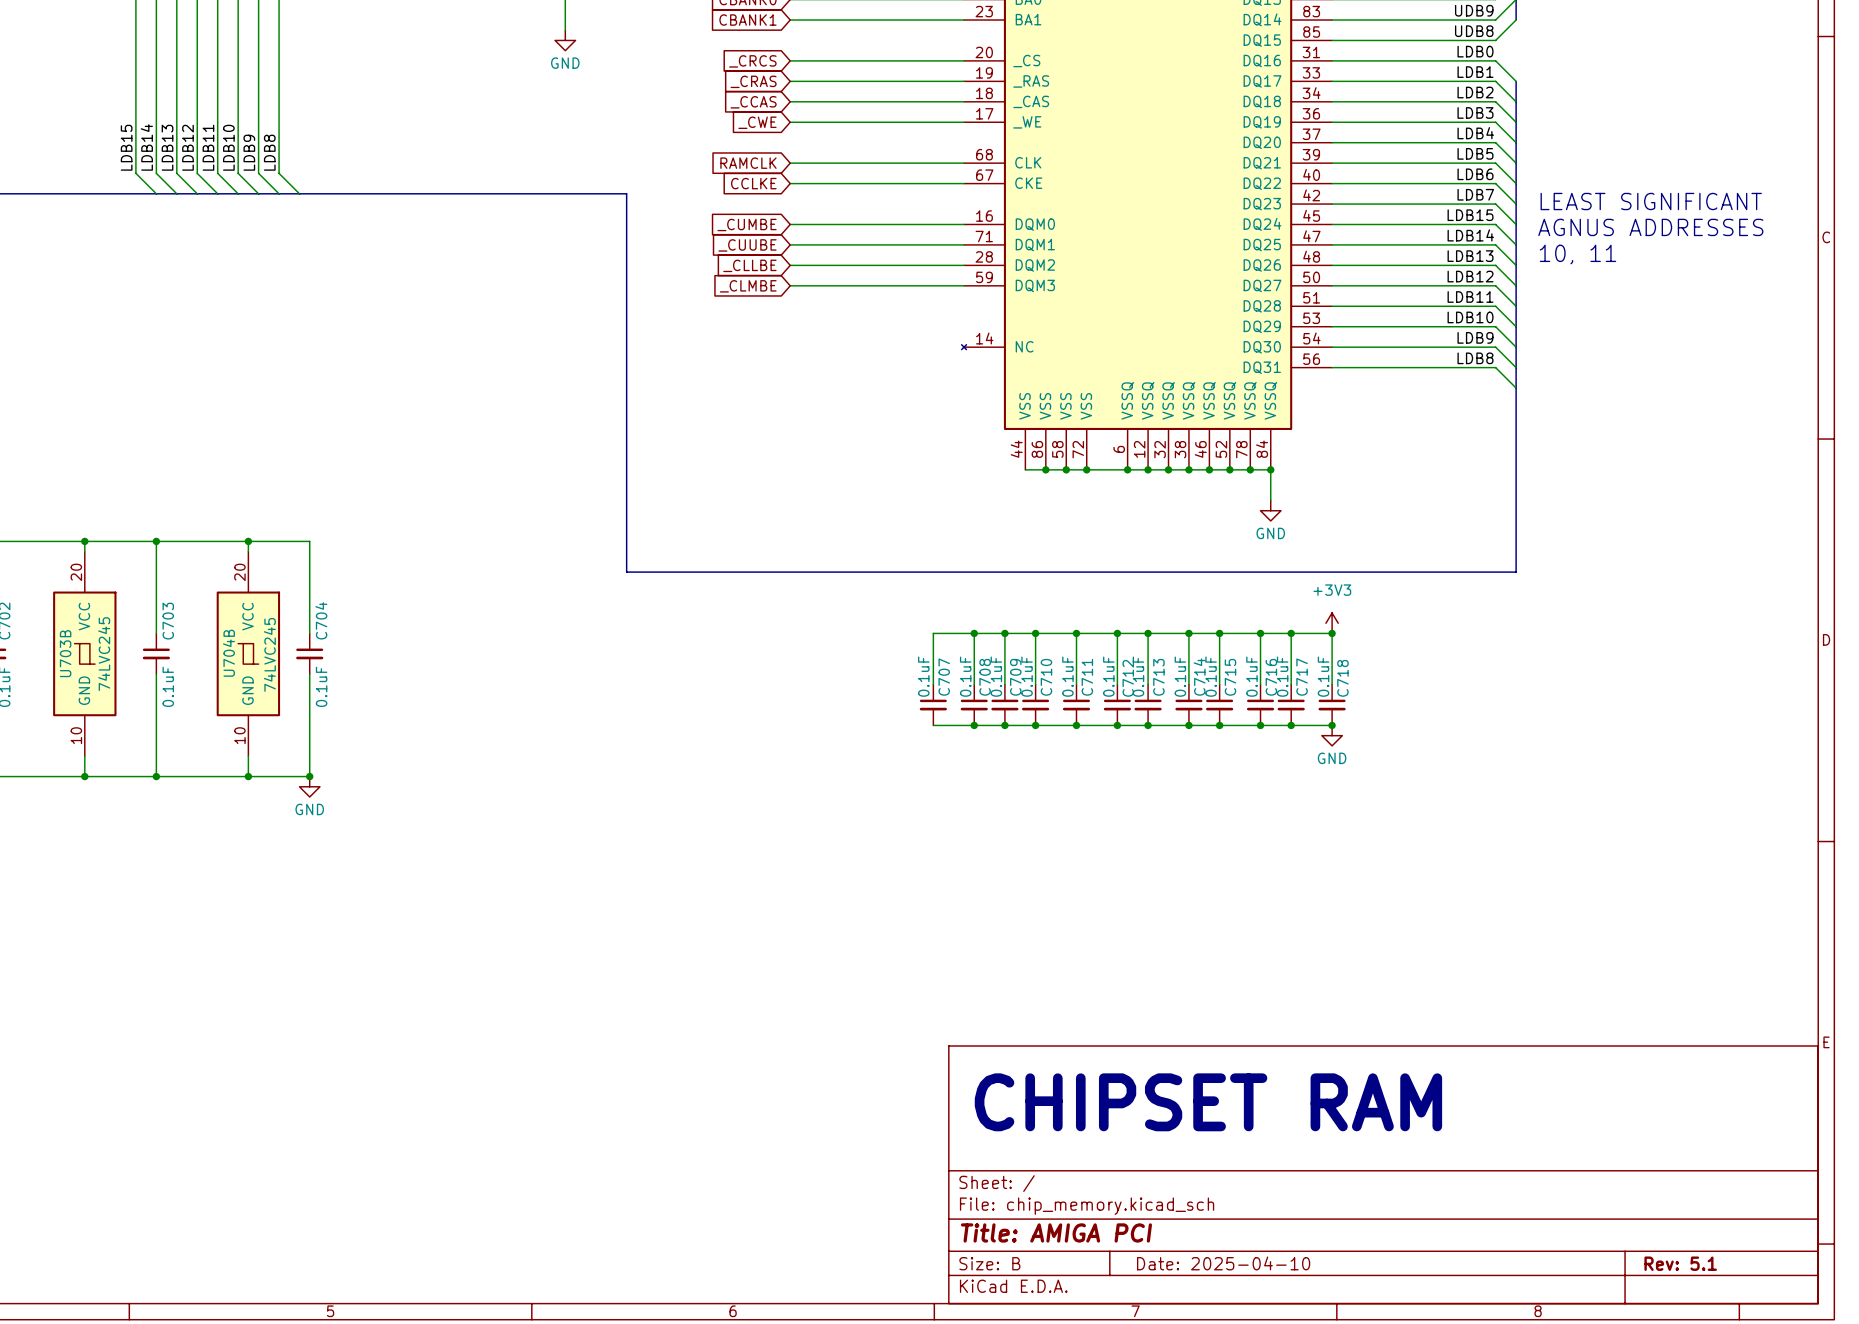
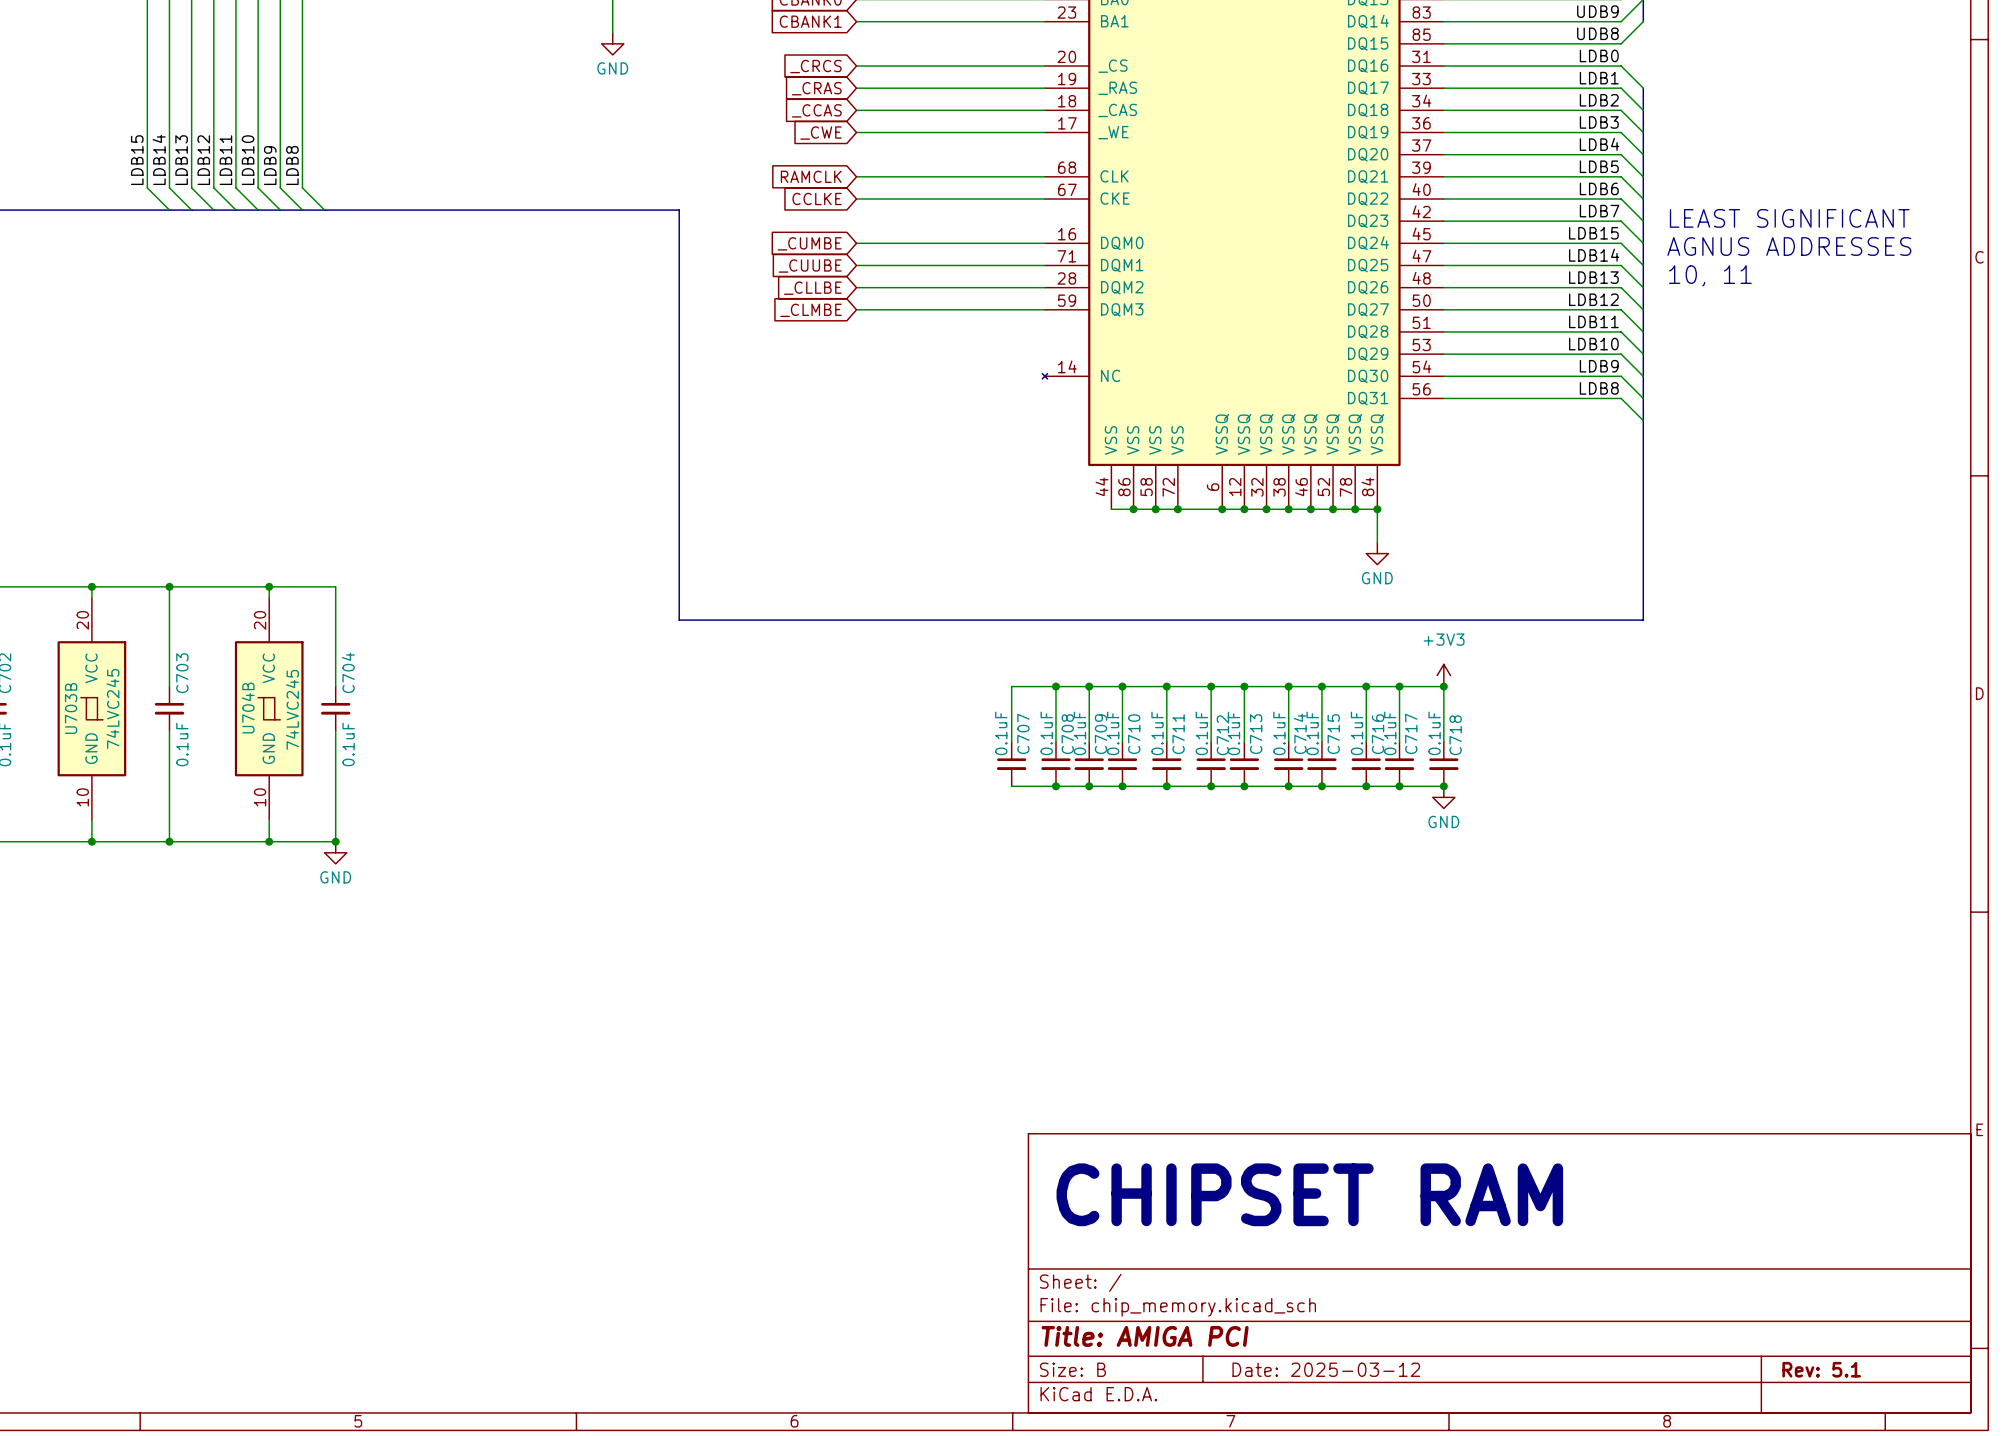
title block: Date: 2025-04-10 (1223, 1263) -> Date: 2025-03-12 (1326, 1369)

